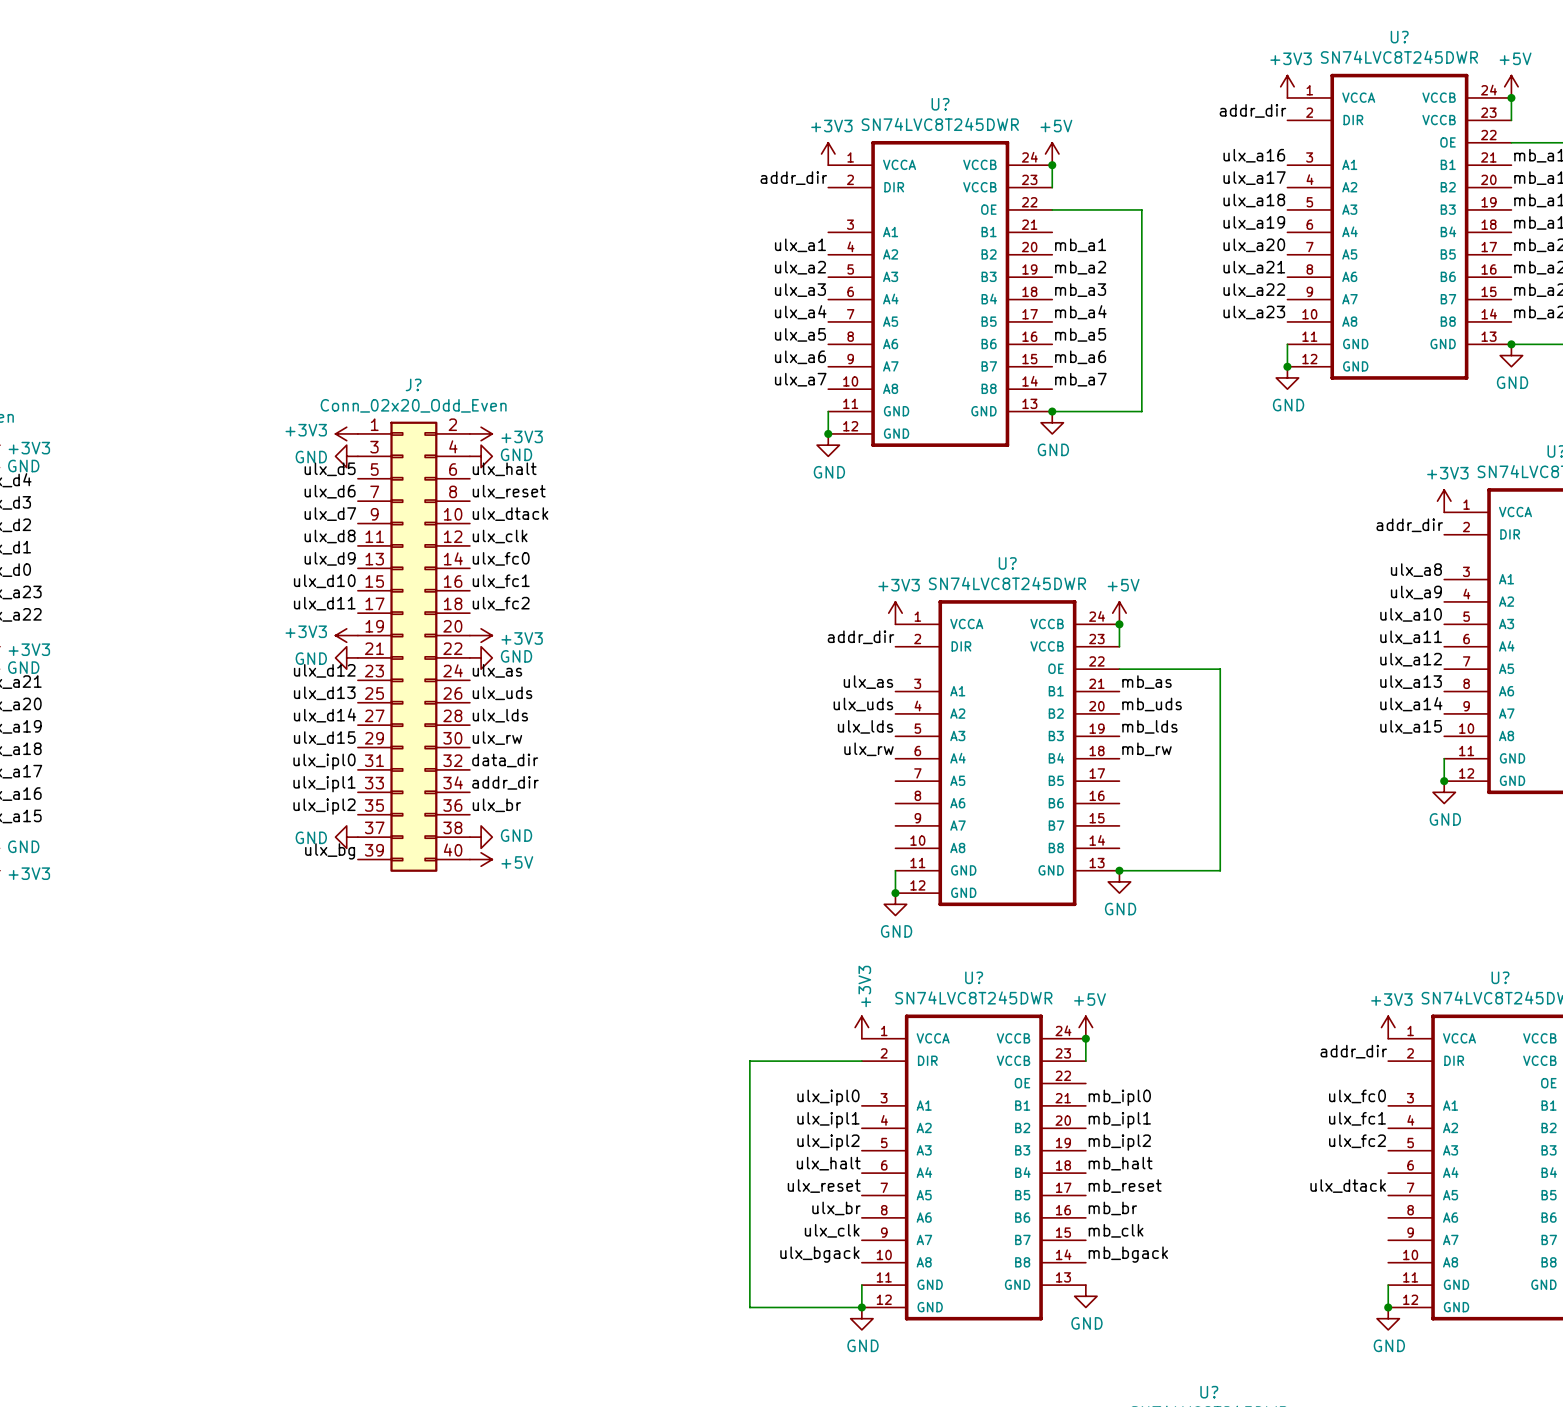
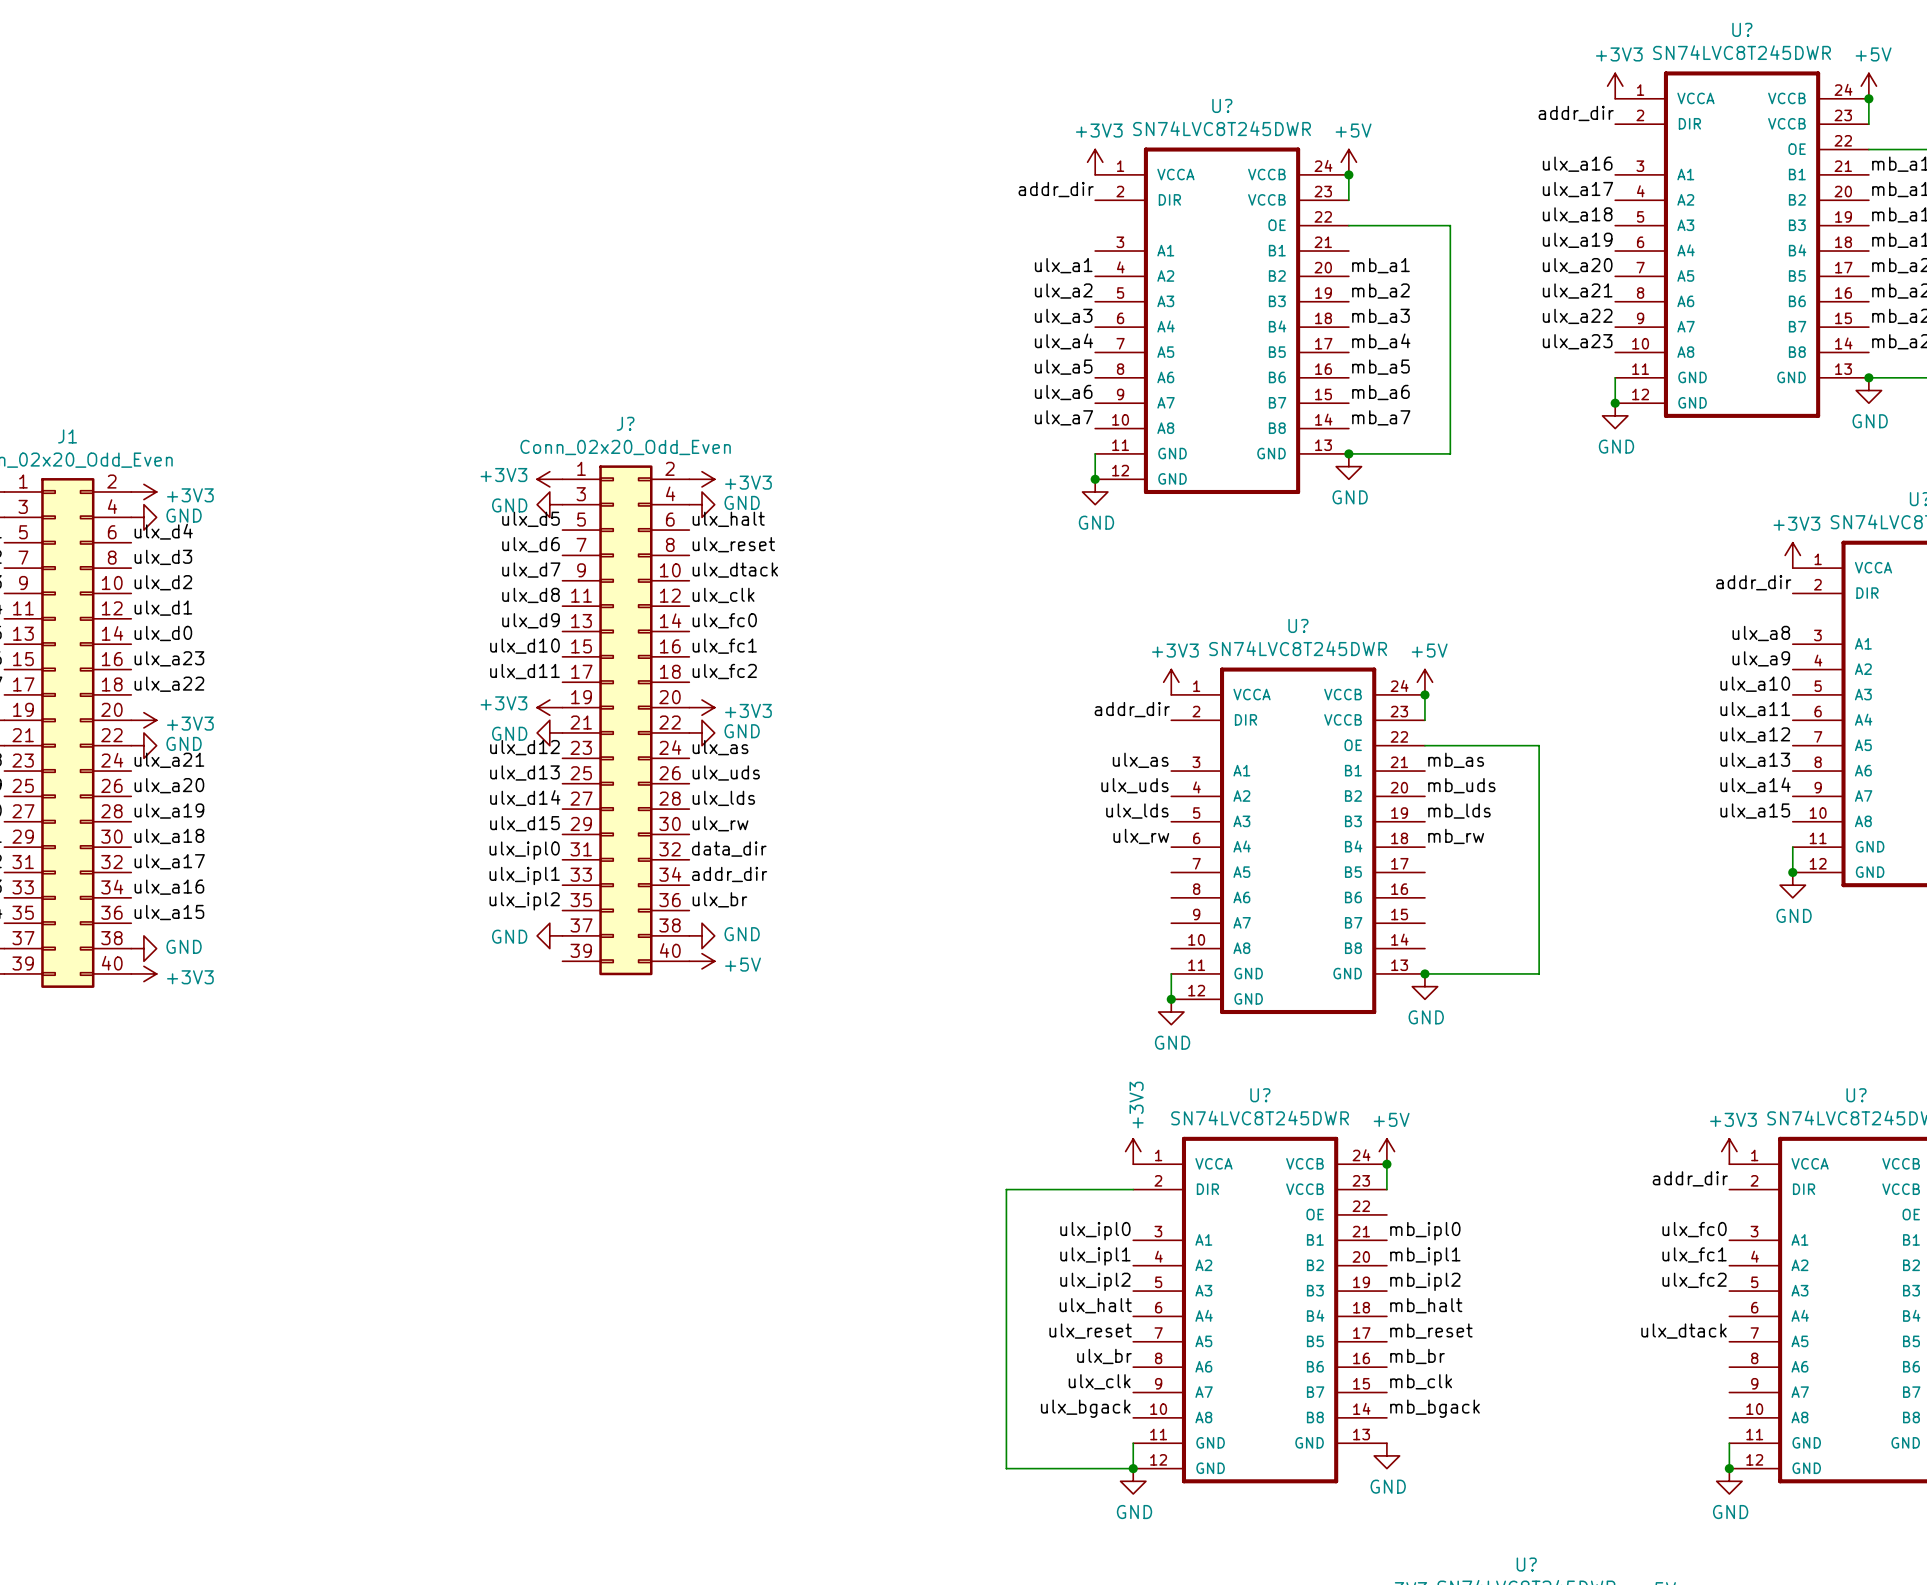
label: ulx_bg (330, 851) -> none

